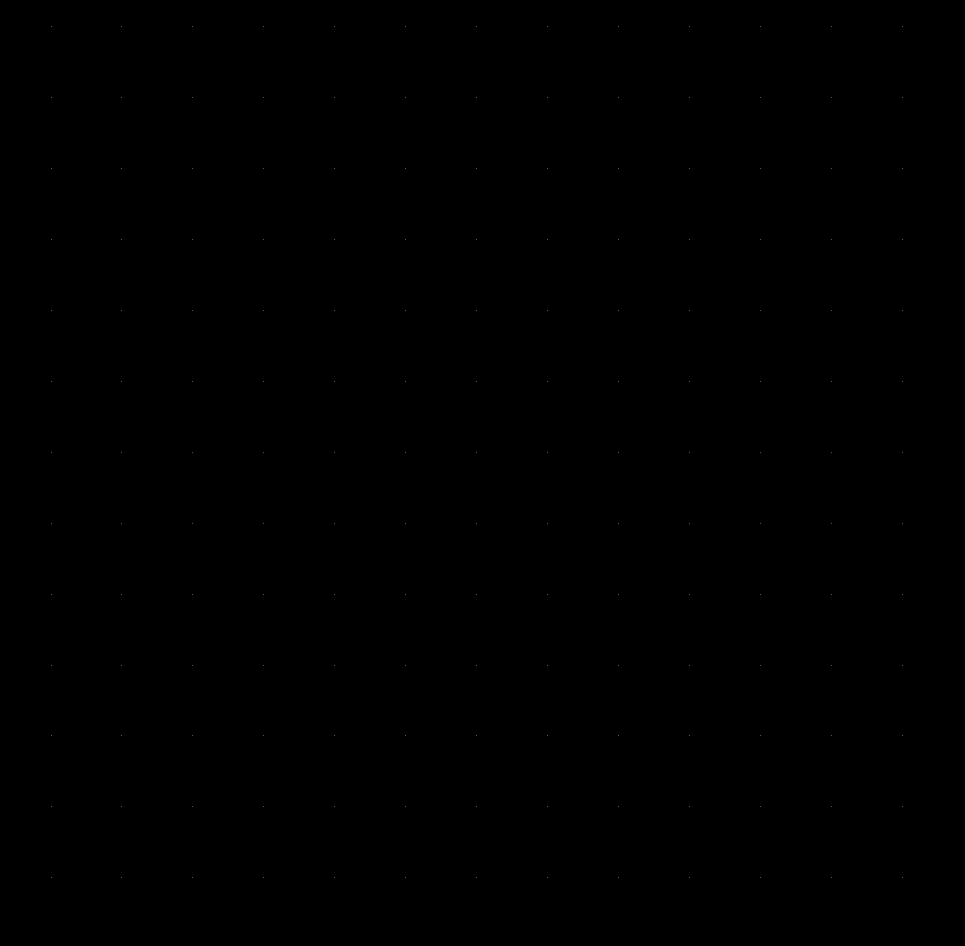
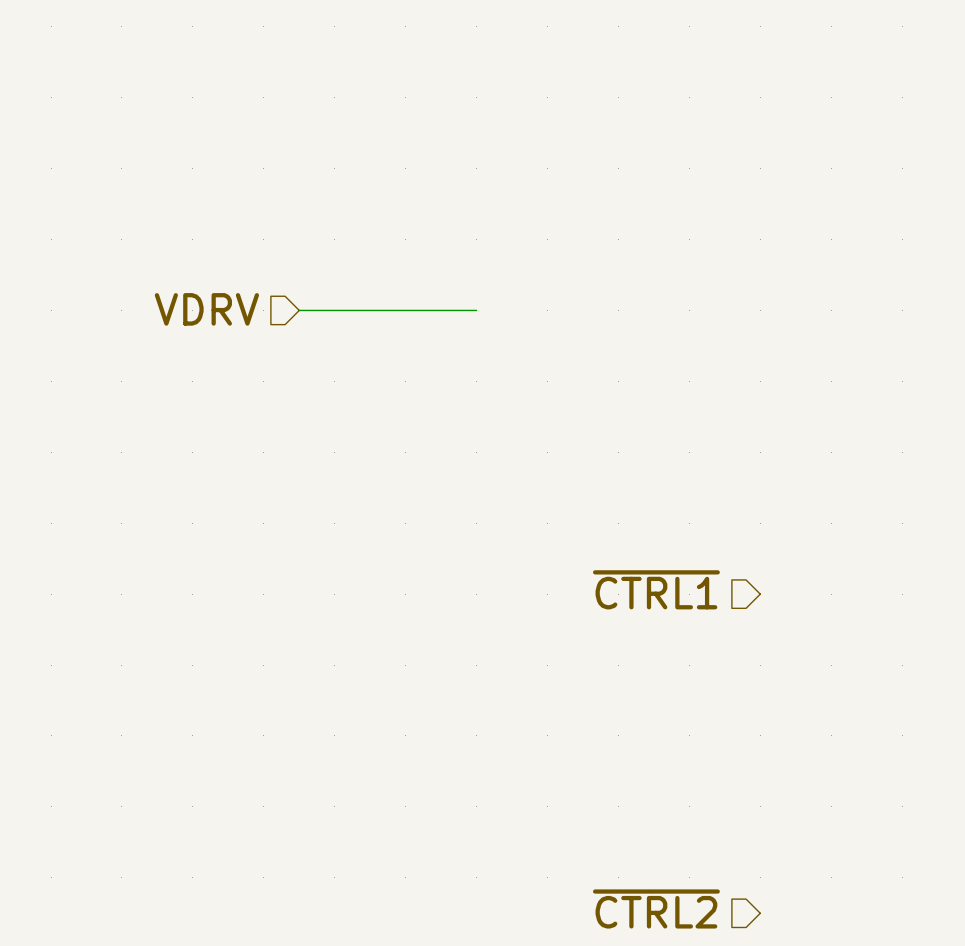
hierarchical label: none -> VDRV (206, 309)
wire: none -> (299, 310) (476, 310)
hierarchical label: none -> ~{CTRL1} (656, 589)
hierarchical label: none -> ~{CTRL2} (656, 908)

